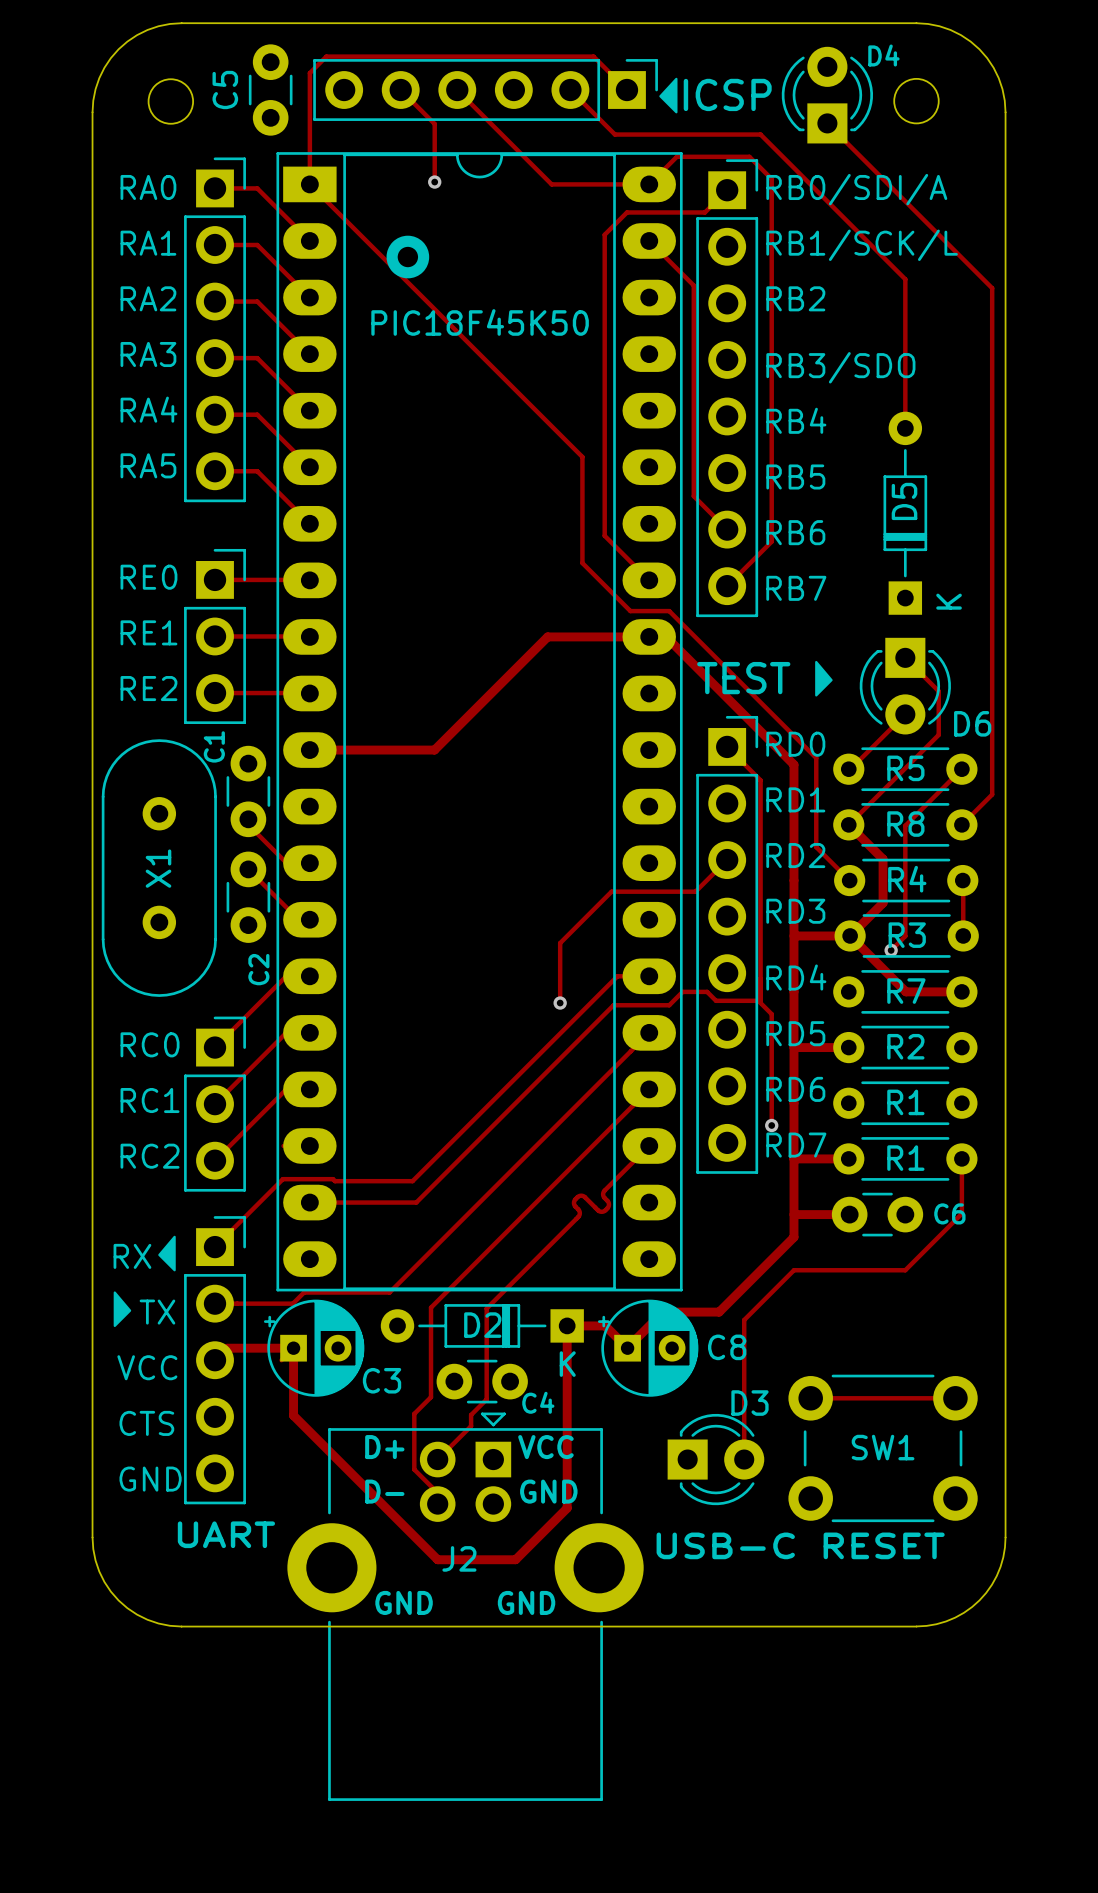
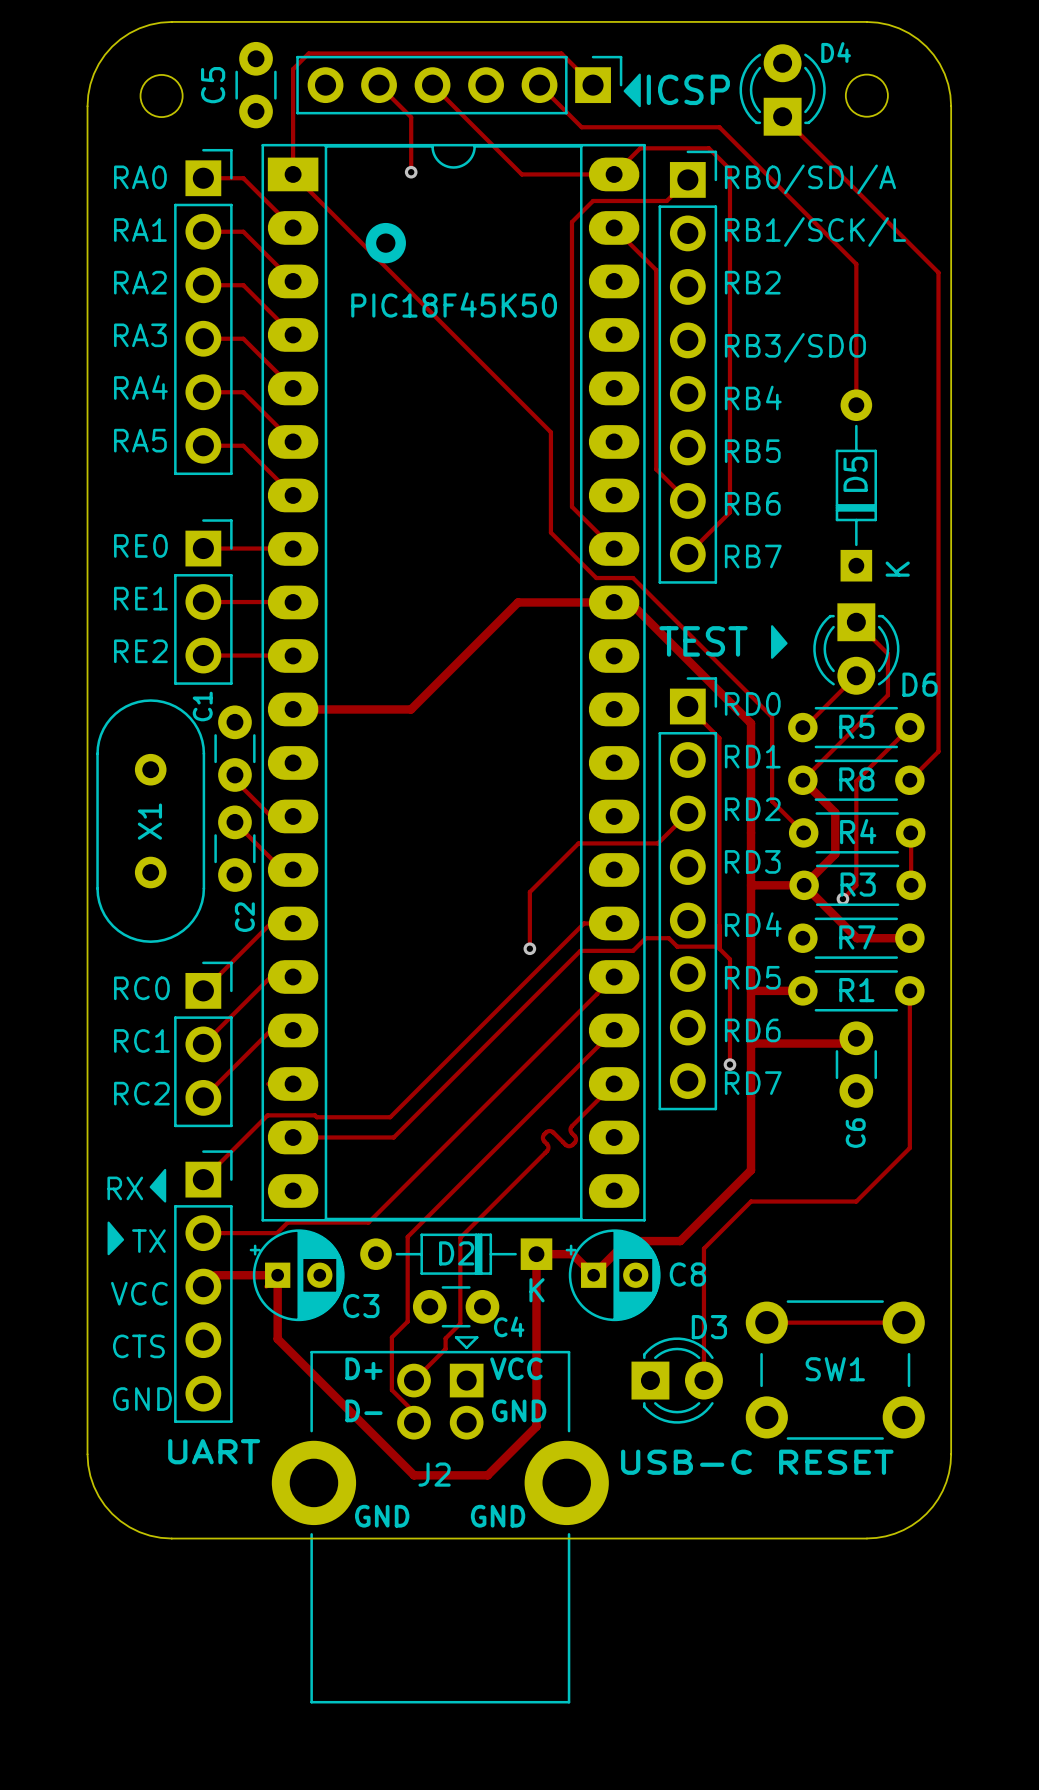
R2 name: R2 (905, 1046) -> R1 (856, 990)
track: none -> (909, 990) (909, 1096)
track: none -> (856, 1038) (851, 1043) (751, 1043)
R1: (905, 1103) -> none
track: (793, 1158) (848, 1158) -> none
R1: (905, 1158) -> none
track: (793, 1214) (849, 1214) -> none
C6 rotation: 0° (877, 1214) -> 90° clockwise (856, 1064)
C6 position: (877, 1214) -> (856, 1064)

